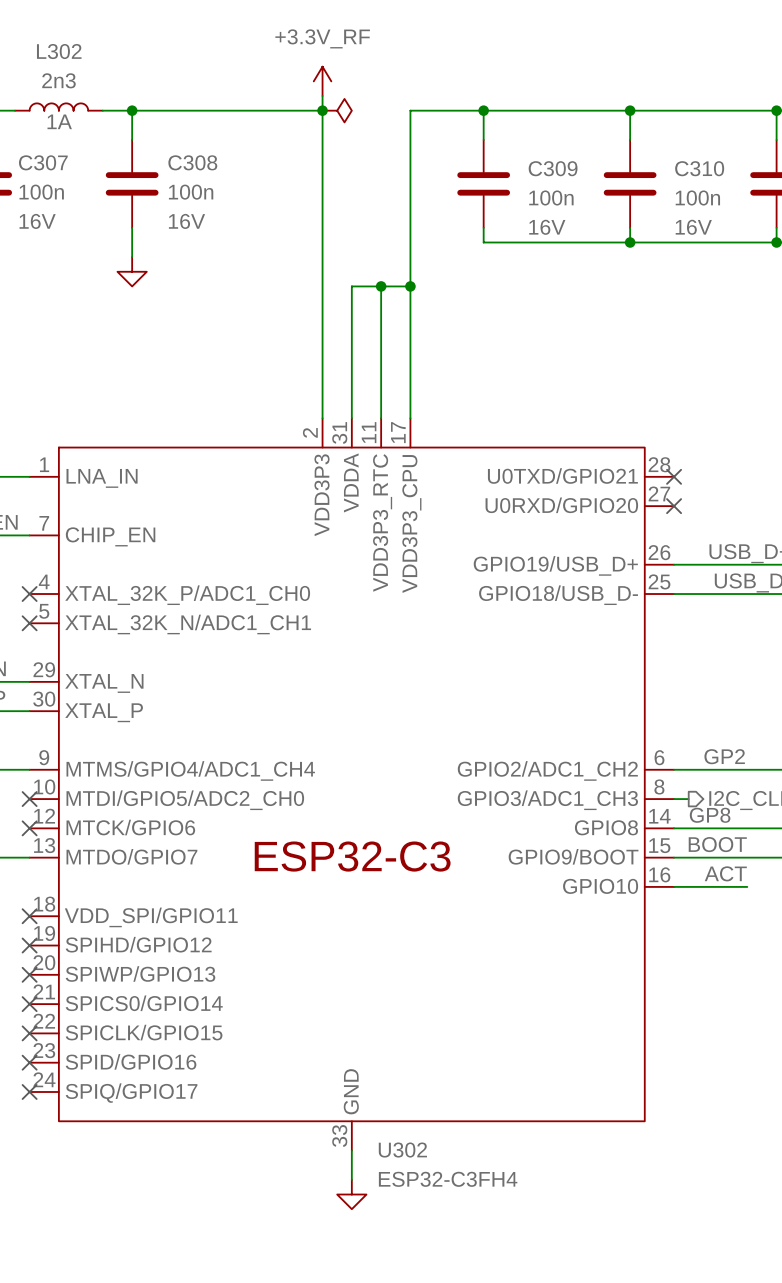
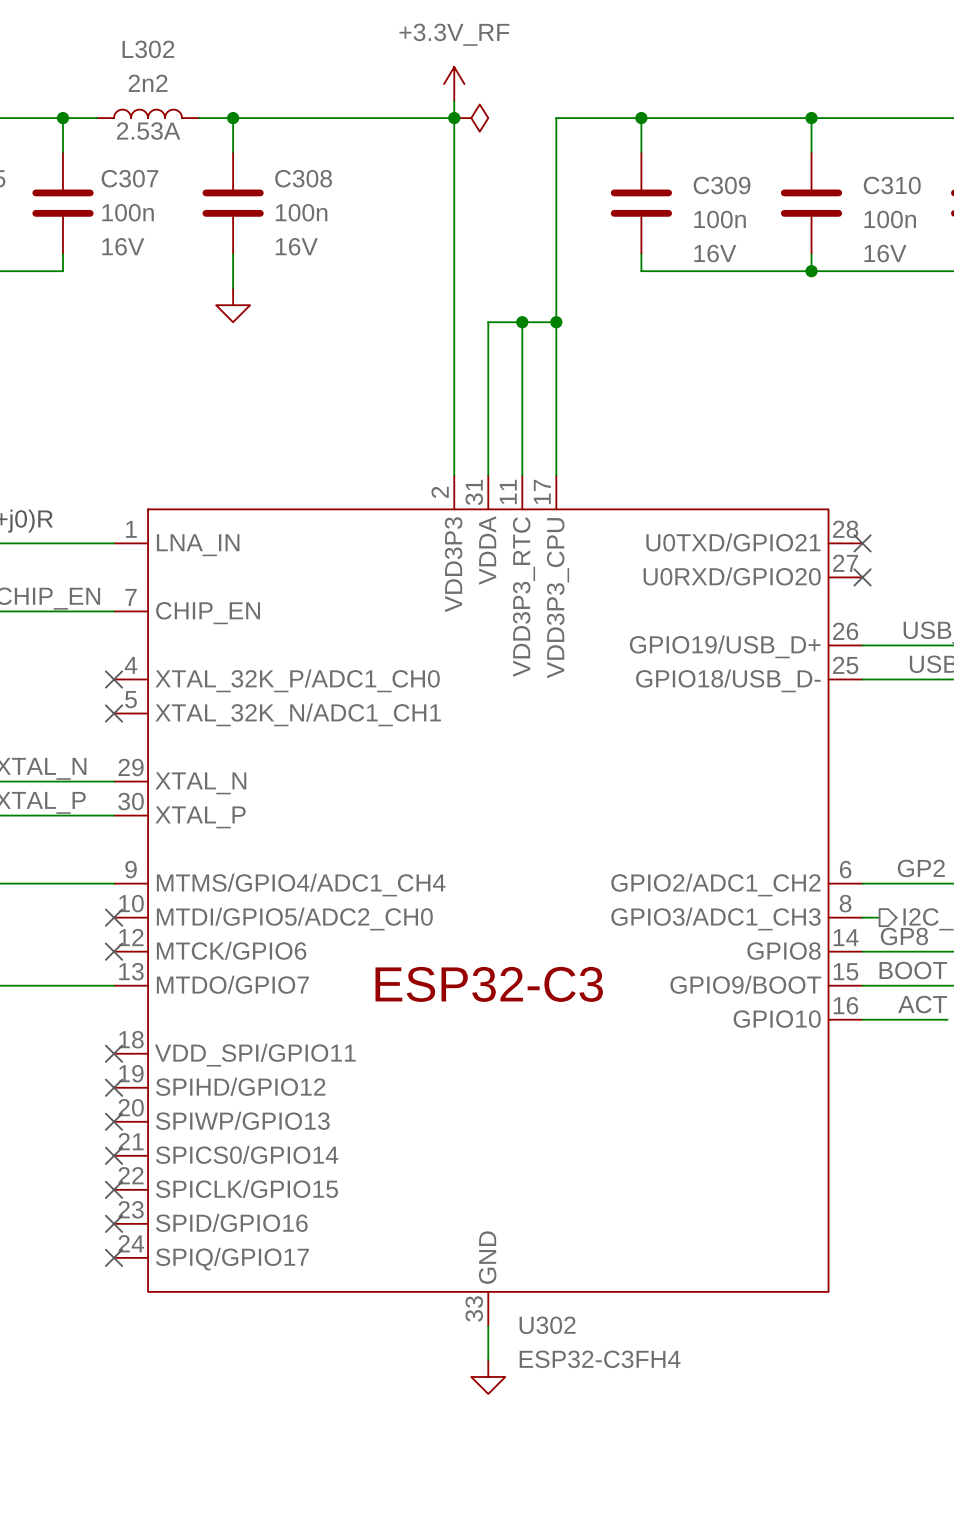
L302 value: 2n3 (58, 80) -> 2n2 (148, 83)
L302 text: 1A (59, 121) -> 2.53A (148, 131)

